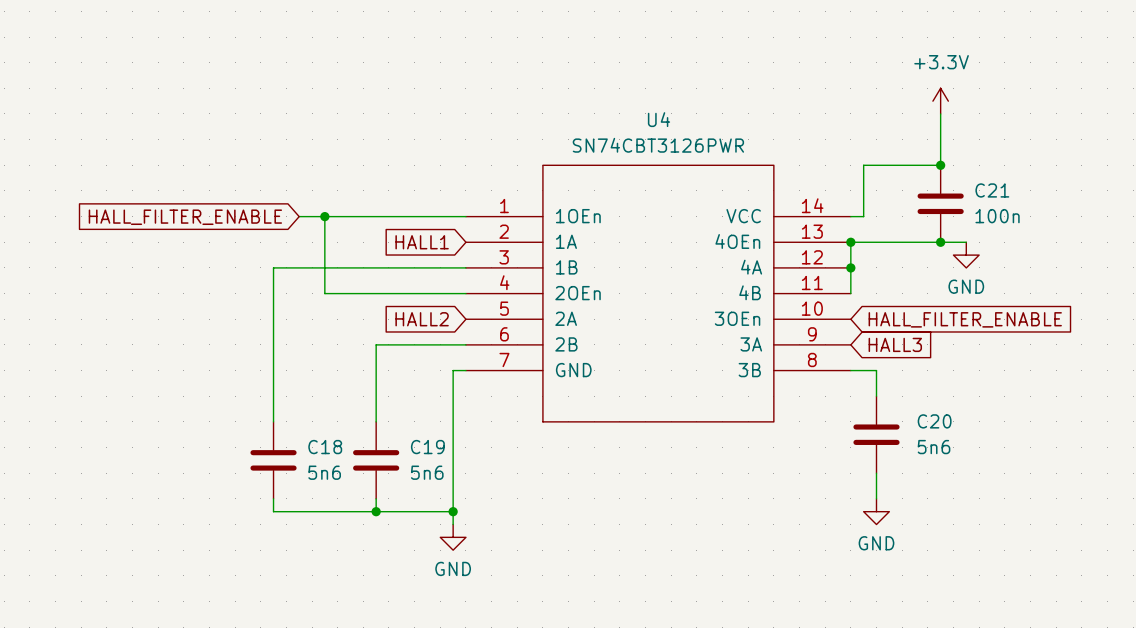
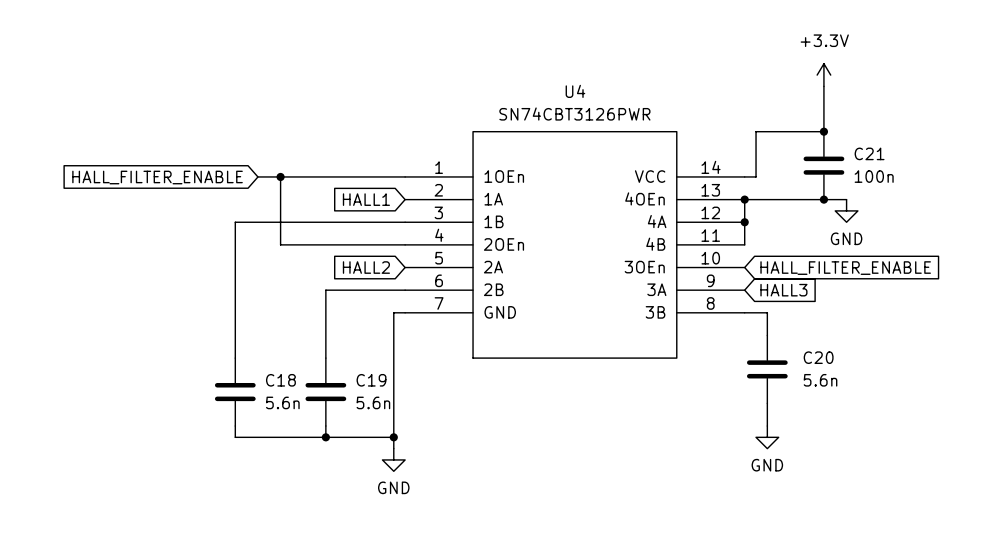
C20 value: 5n6 (934, 447) -> 5.6n (820, 380)
C18 value: 5n6 (324, 472) -> 5.6n (282, 402)
C19 value: 5n6 (427, 472) -> 5.6n (373, 402)

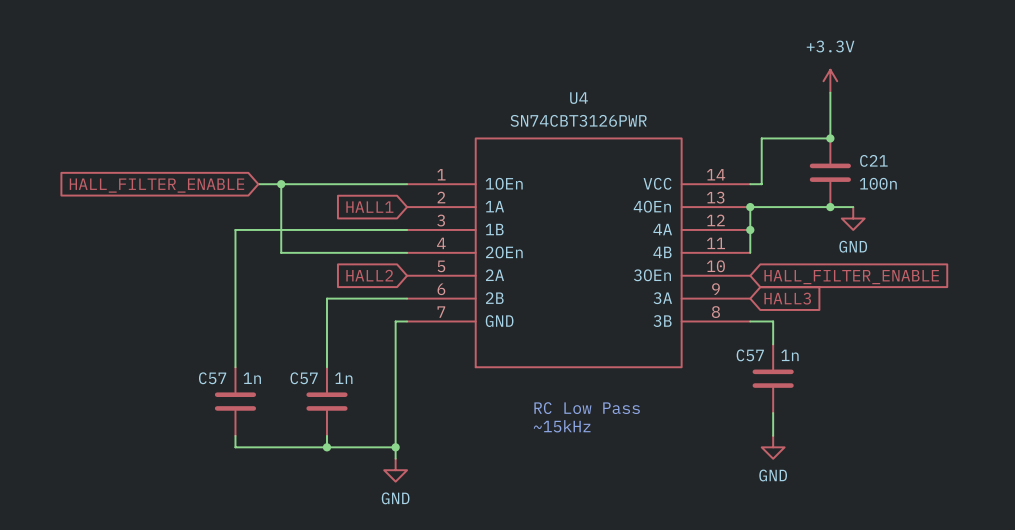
C20 name: C20 (818, 357) -> C57 (750, 355)
C18 name: C18 (280, 380) -> C57 (212, 378)
C19 name: C19 (371, 380) -> C57 (304, 378)
C20 value: 5.6n (820, 380) -> 1n (790, 355)
text: none -> RC Low Pass (587, 408)
C18 value: 5.6n (282, 402) -> 1n (252, 378)
C19 value: 5.6n (373, 402) -> 1n (343, 378)
text: none -> ~15kHz (562, 426)

